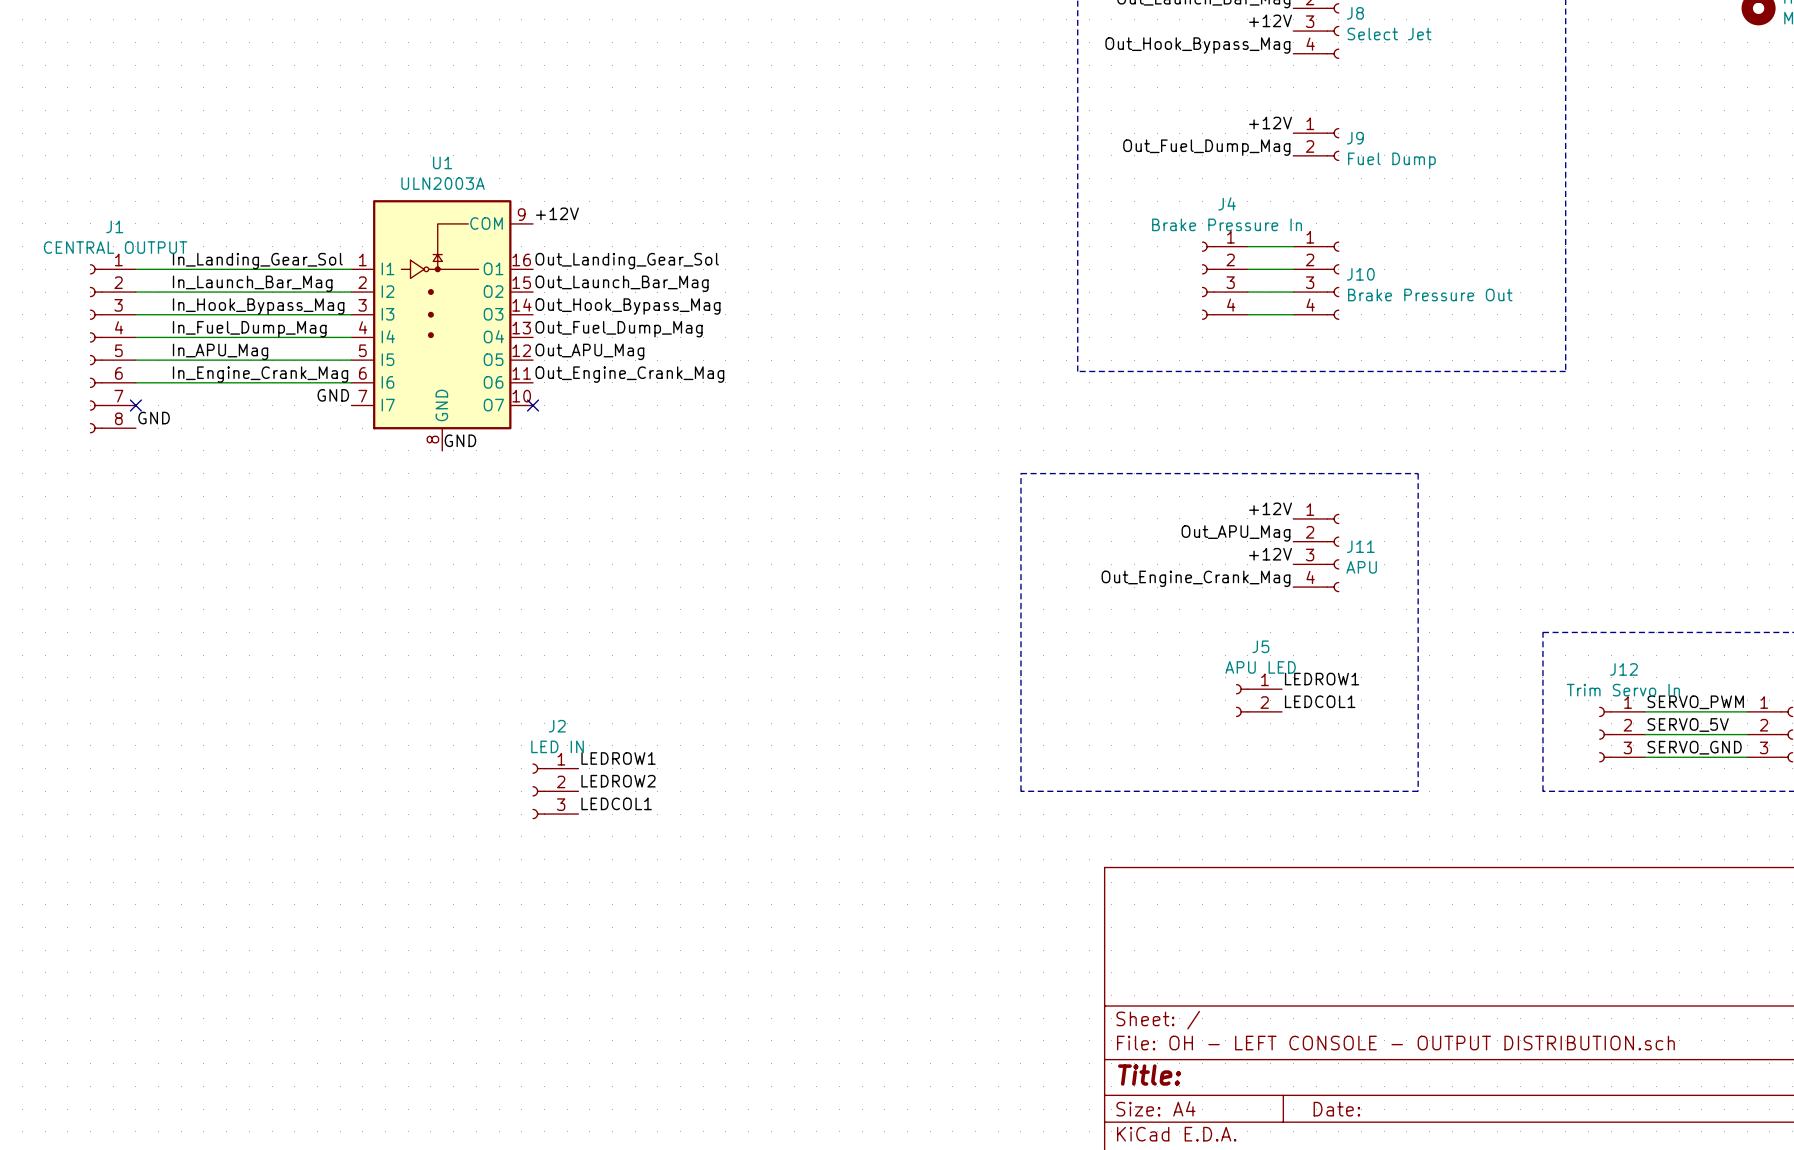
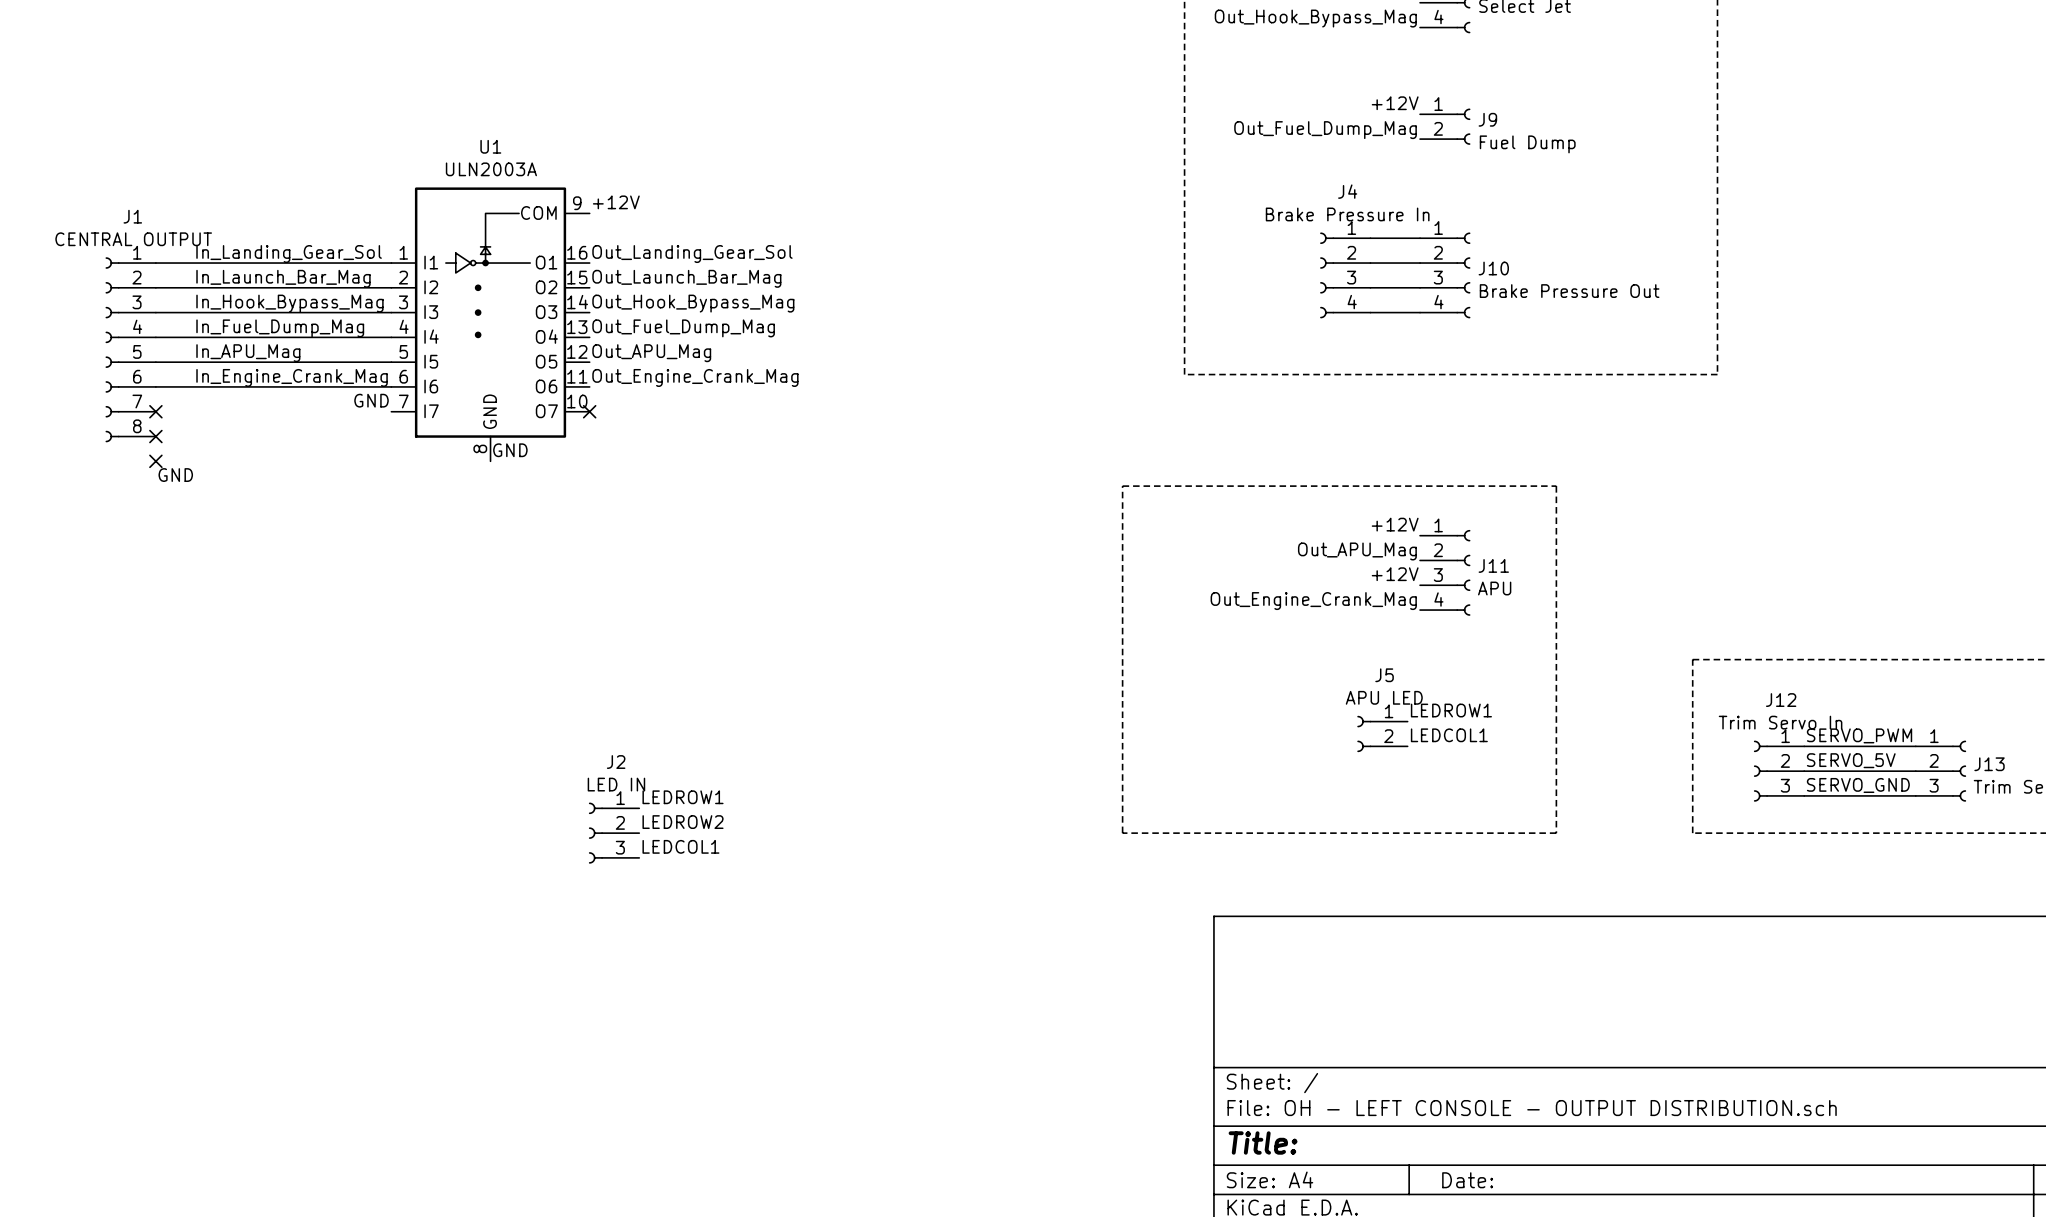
label position: GND (154, 418) -> GND (175, 475)
no-connect mark: none -> (155, 436)
no-connect mark: none -> (155, 461)

